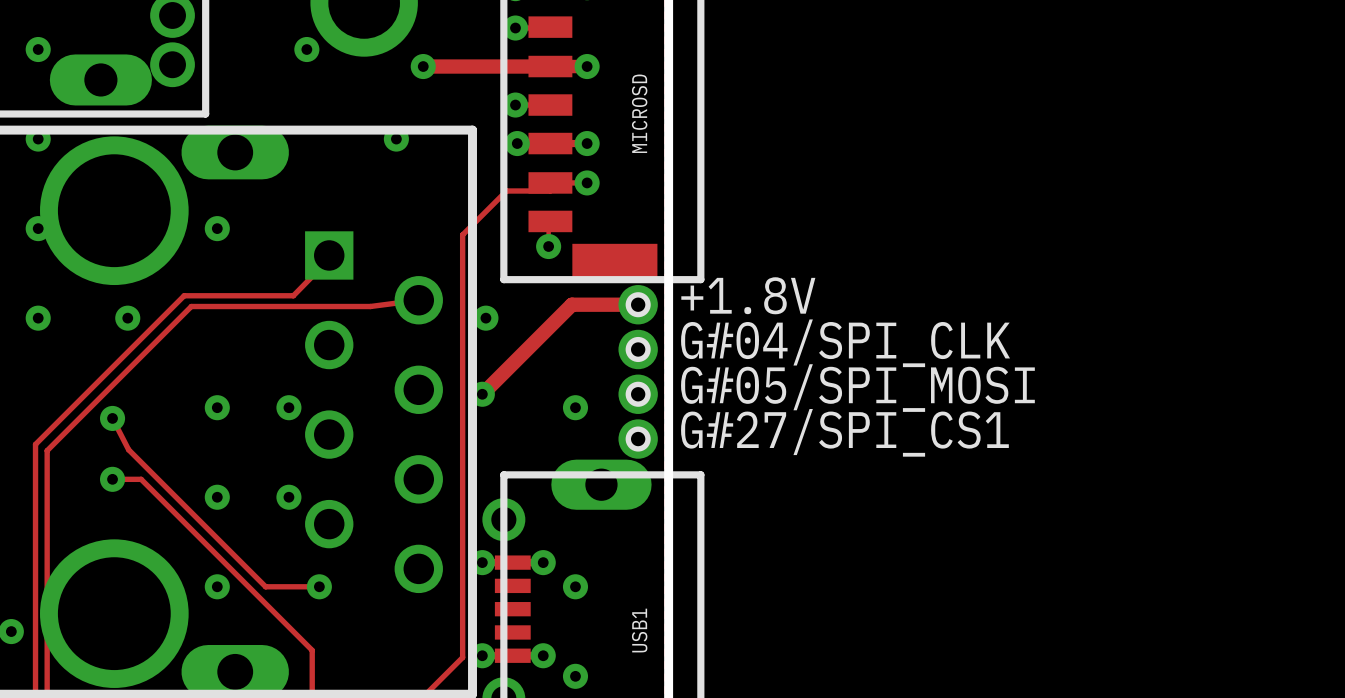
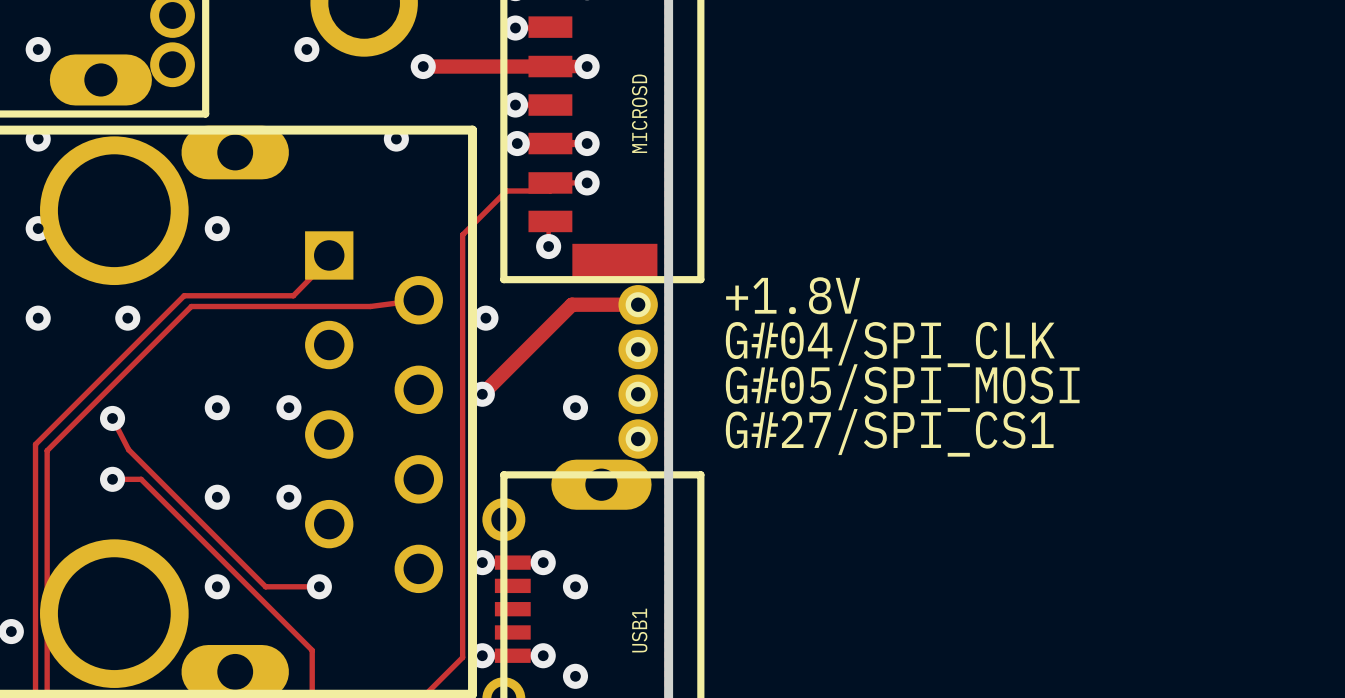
text position: +1.8V (748, 295) -> +1.8V (793, 295)
text position: G#04/SPI_CLK (845, 343) -> G#04/SPI_CLK (890, 343)
text position: G#05/SPI_MOSI (857, 388) -> G#05/SPI_MOSI (902, 388)
text position: G#27/SPI_CS1 (844, 432) -> G#27/SPI_CS1 (889, 432)

